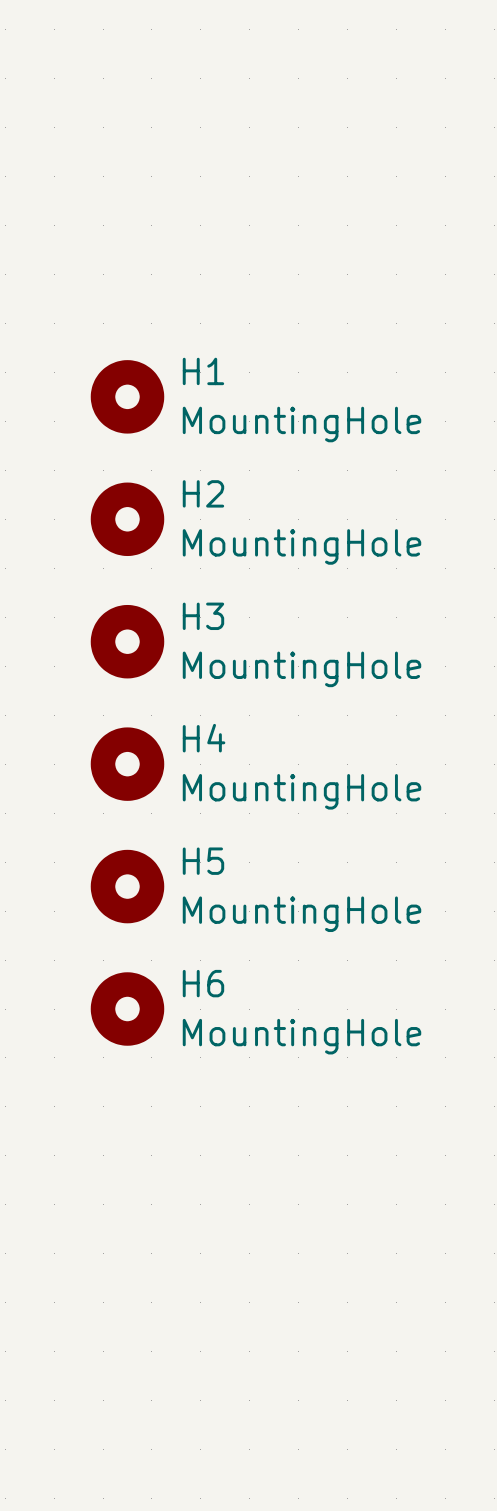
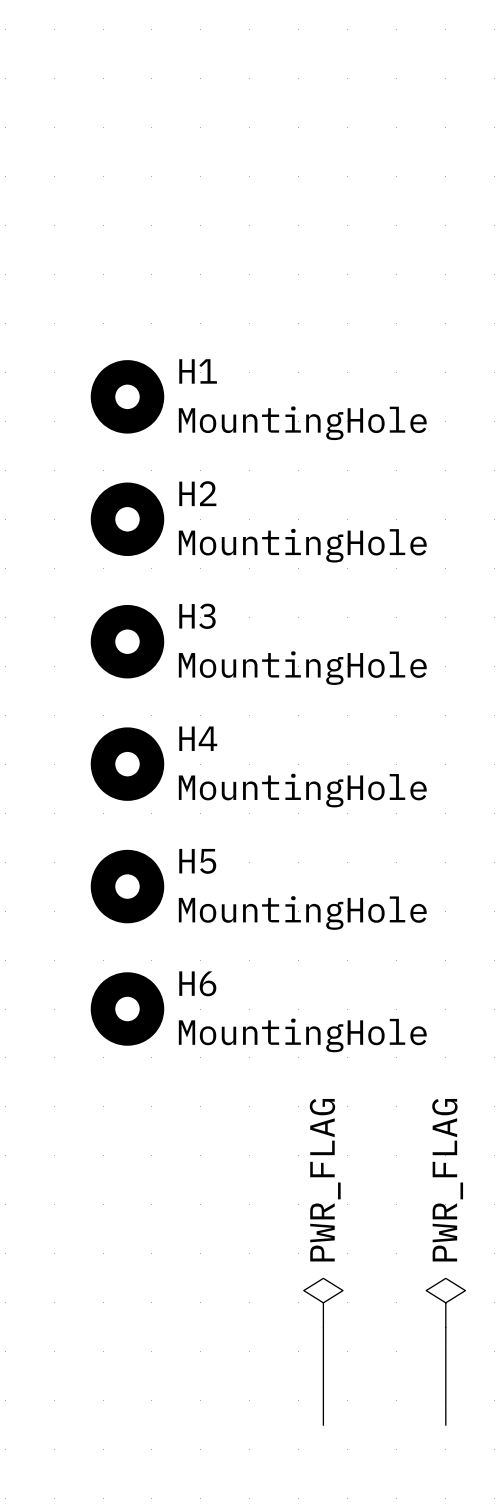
power symbol: none -> PWR_FLAG (323, 1302)
power symbol: none -> PWR_FLAG (445, 1302)
wire: none -> (323, 1327) (323, 1425)
wire: none -> (445, 1327) (445, 1425)

